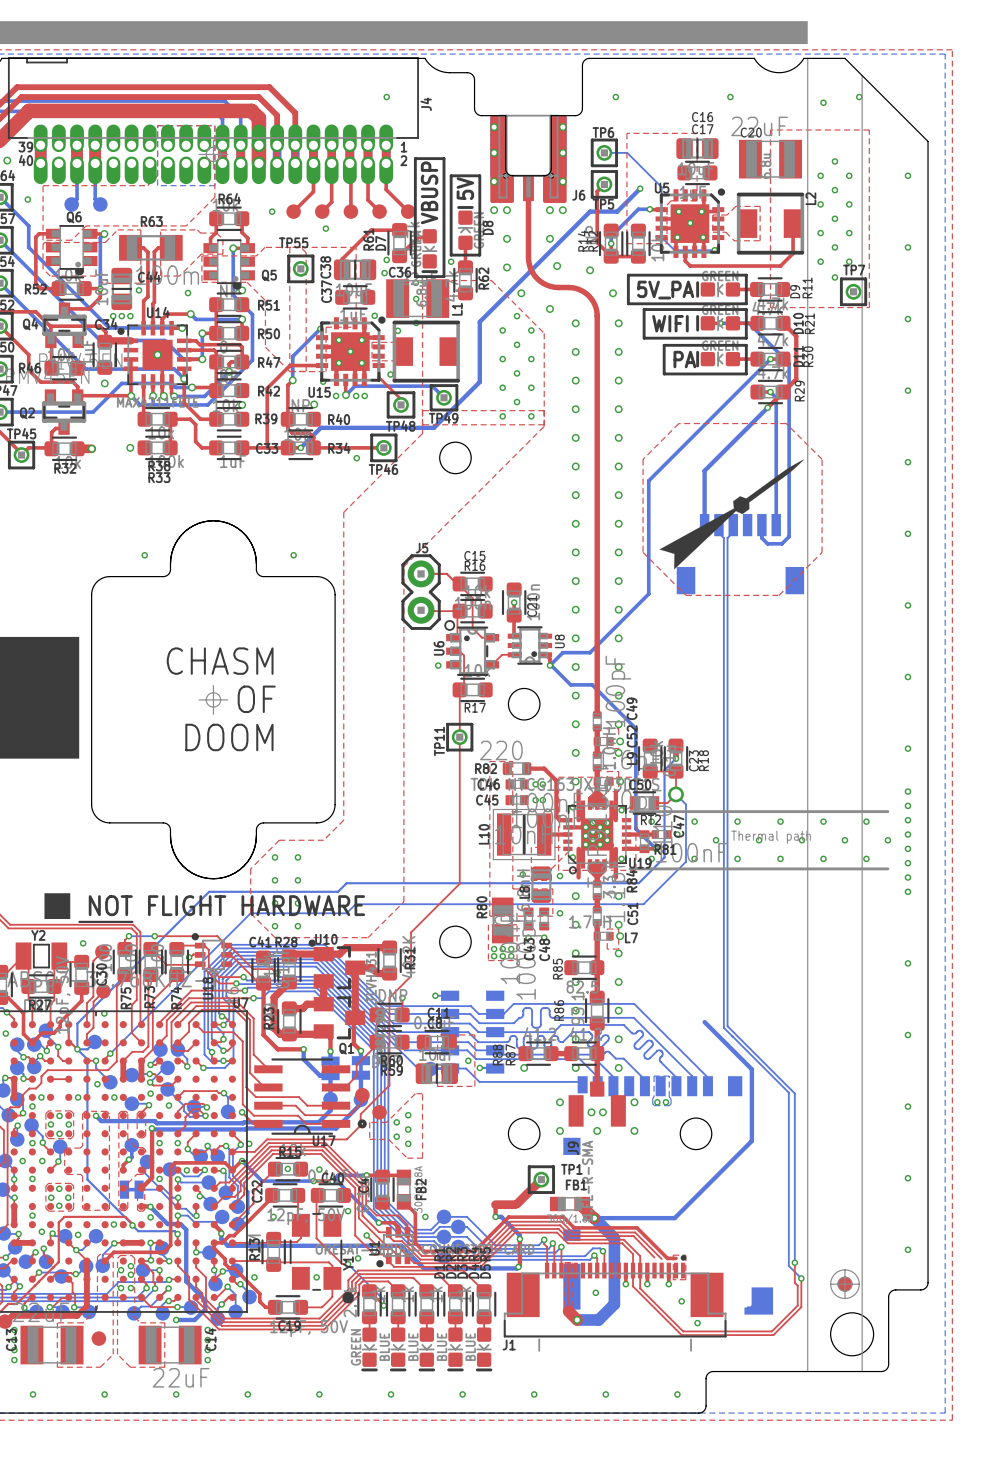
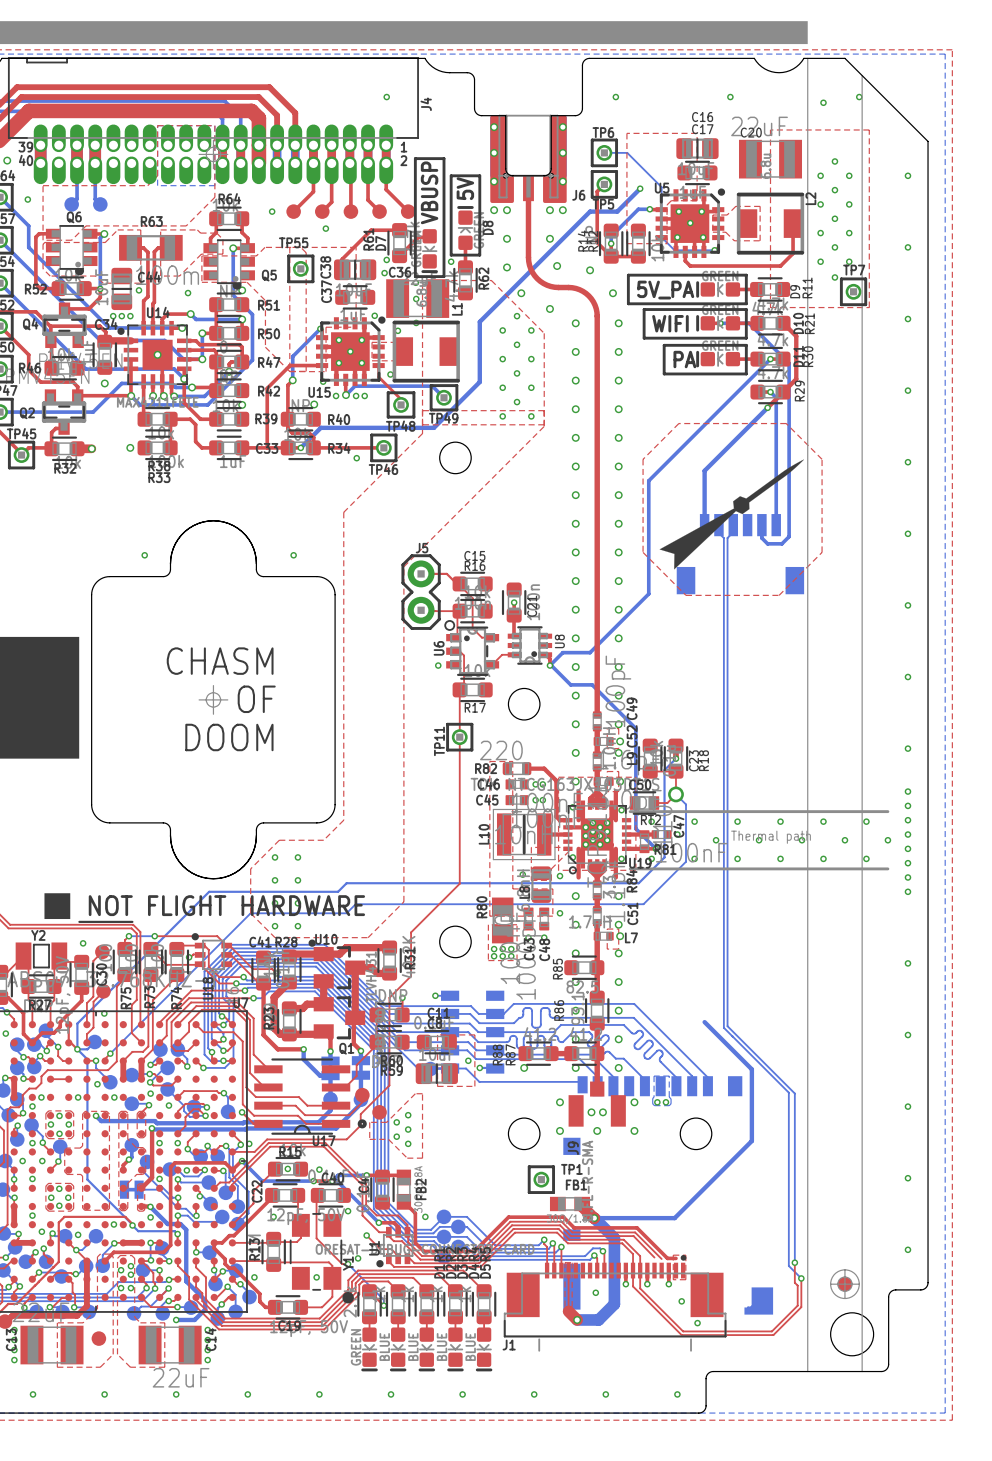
top track: (541, 1179) (517, 1203) -> none
top track: (514, 1204) (495, 1204) (495, 1216) -> none
top track: (214, 1206) (223, 1196) (234, 1196) (240, 1191) (240, 1181) (271, 1150) (322, 1150) (358, 1186) (358, 1218) (386, 1245) (397, 1245) (407, 1255) -> none
top track: (232, 1206) (244, 1194) (244, 1182) (273, 1153) (320, 1153) (355, 1188) (355, 1235) (374, 1254) (383, 1254) (387, 1258) -> none
bottom track: (495, 1216) (501, 1216) (519, 1235) (519, 1239) -> none
via: (495, 1216) -> none
top track: (214, 1224) (221, 1233) -> none
bottom track: (221, 1233) (221, 1239) (227, 1245) (401, 1245) (423, 1268) (518, 1266) -> none
via: (221, 1233) -> none
top track: (519, 1239) (518, 1266) -> none
via: (519, 1239) -> none
via: (518, 1266) -> none

